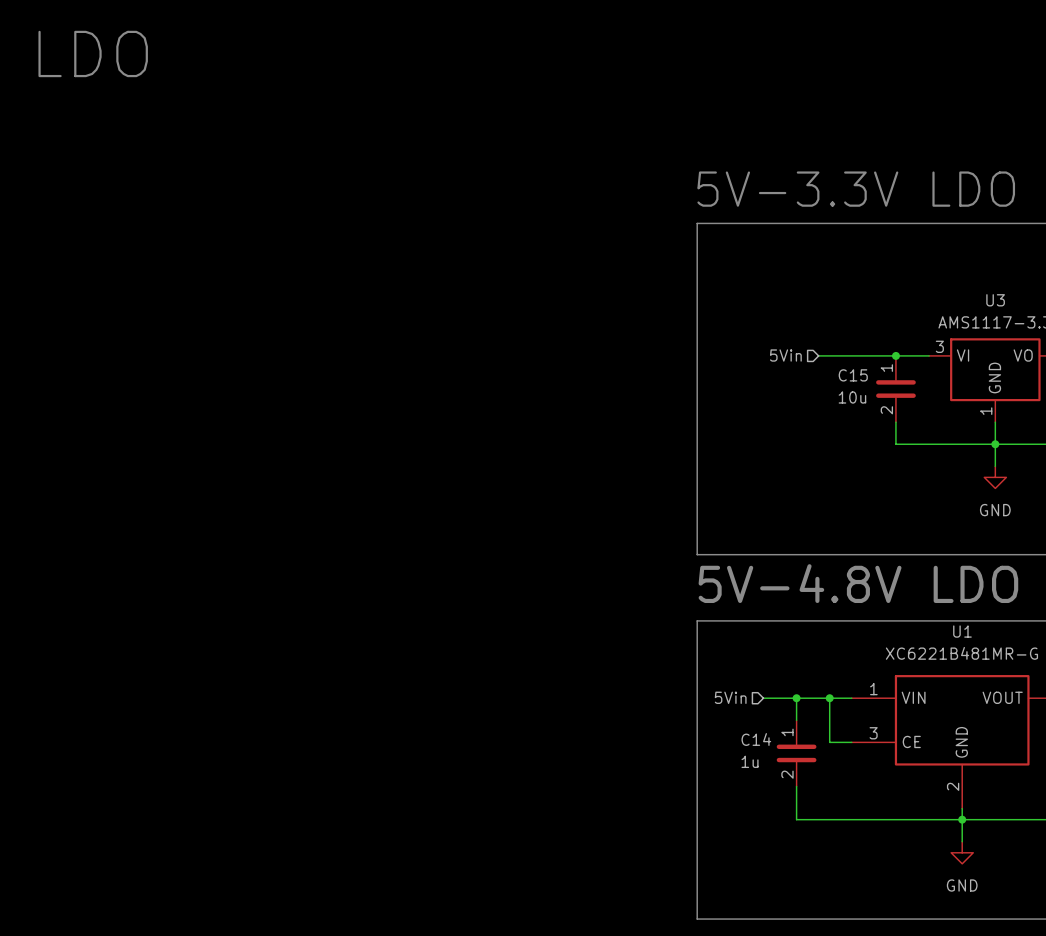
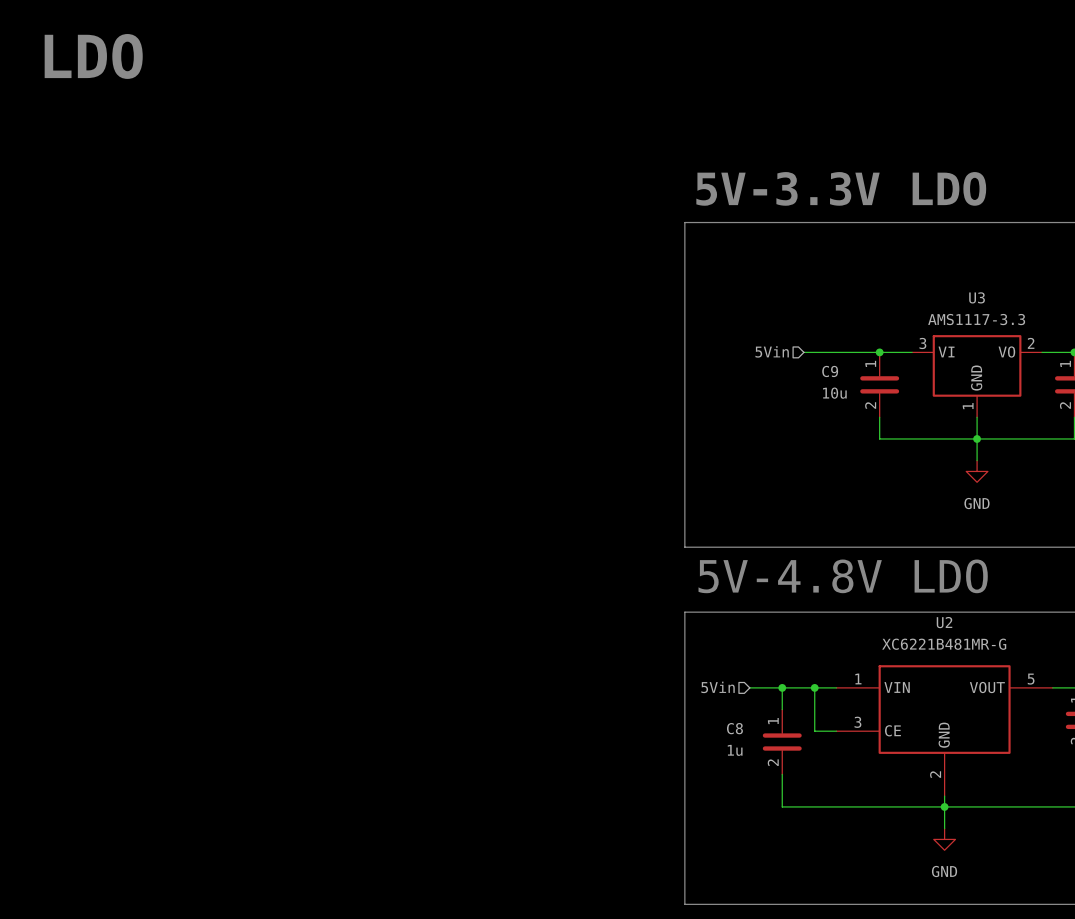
C15 name: C15 (853, 375) -> C9 (830, 371)
U1 name: U1 (962, 631) -> U2 (944, 622)
C14 name: C14 (756, 739) -> C8 (734, 728)

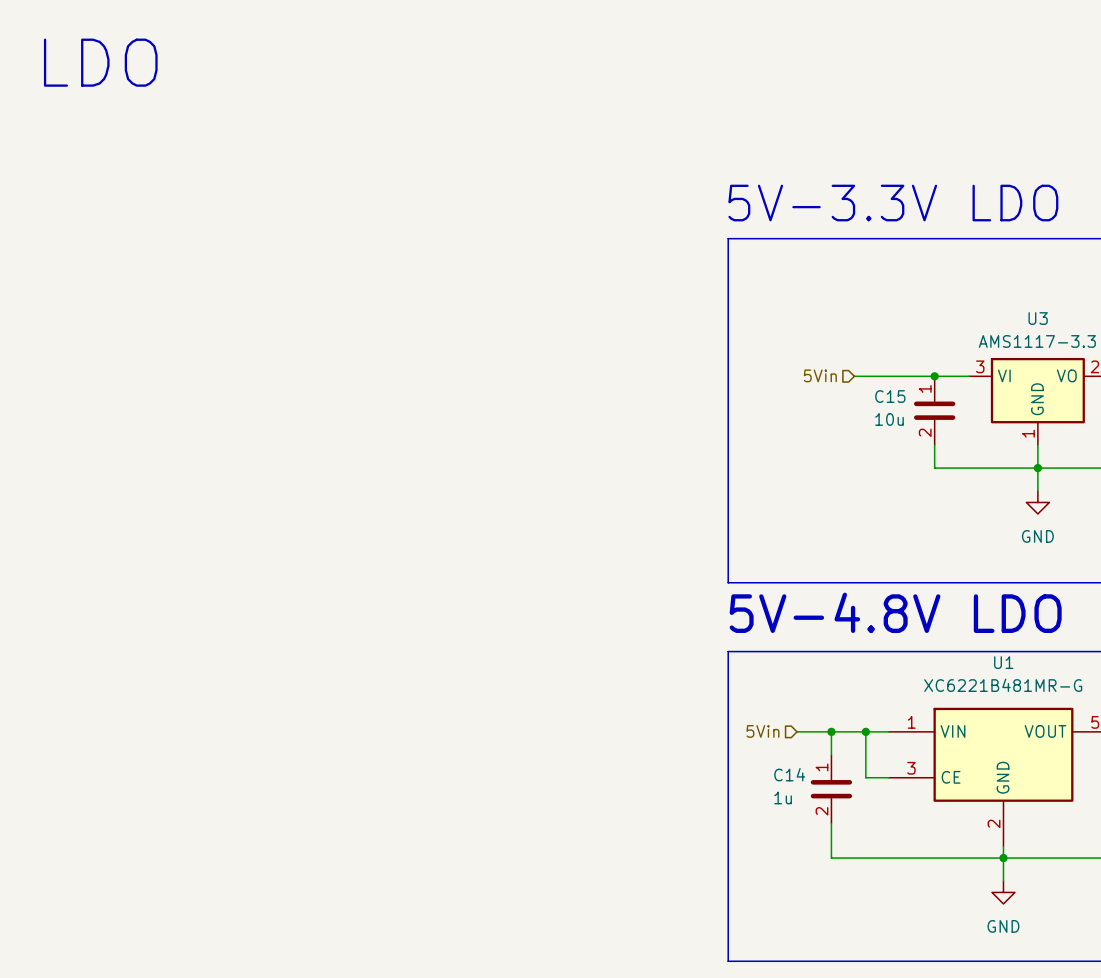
C9 name: C9 (830, 371) -> C15 (890, 396)
U2 name: U2 (944, 622) -> U1 (1003, 662)
C8 name: C8 (734, 728) -> C14 (789, 774)

